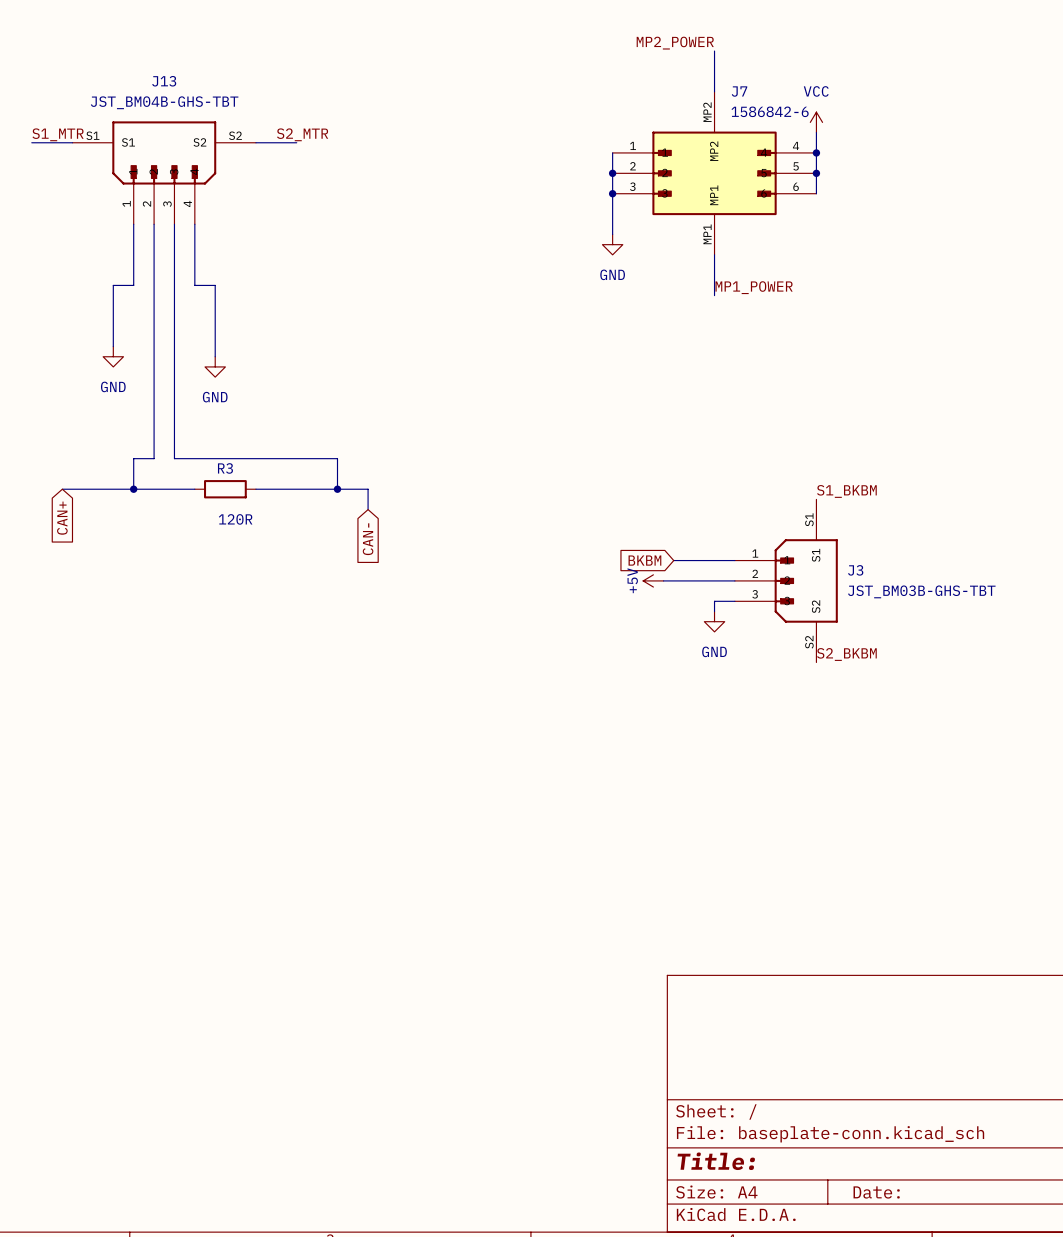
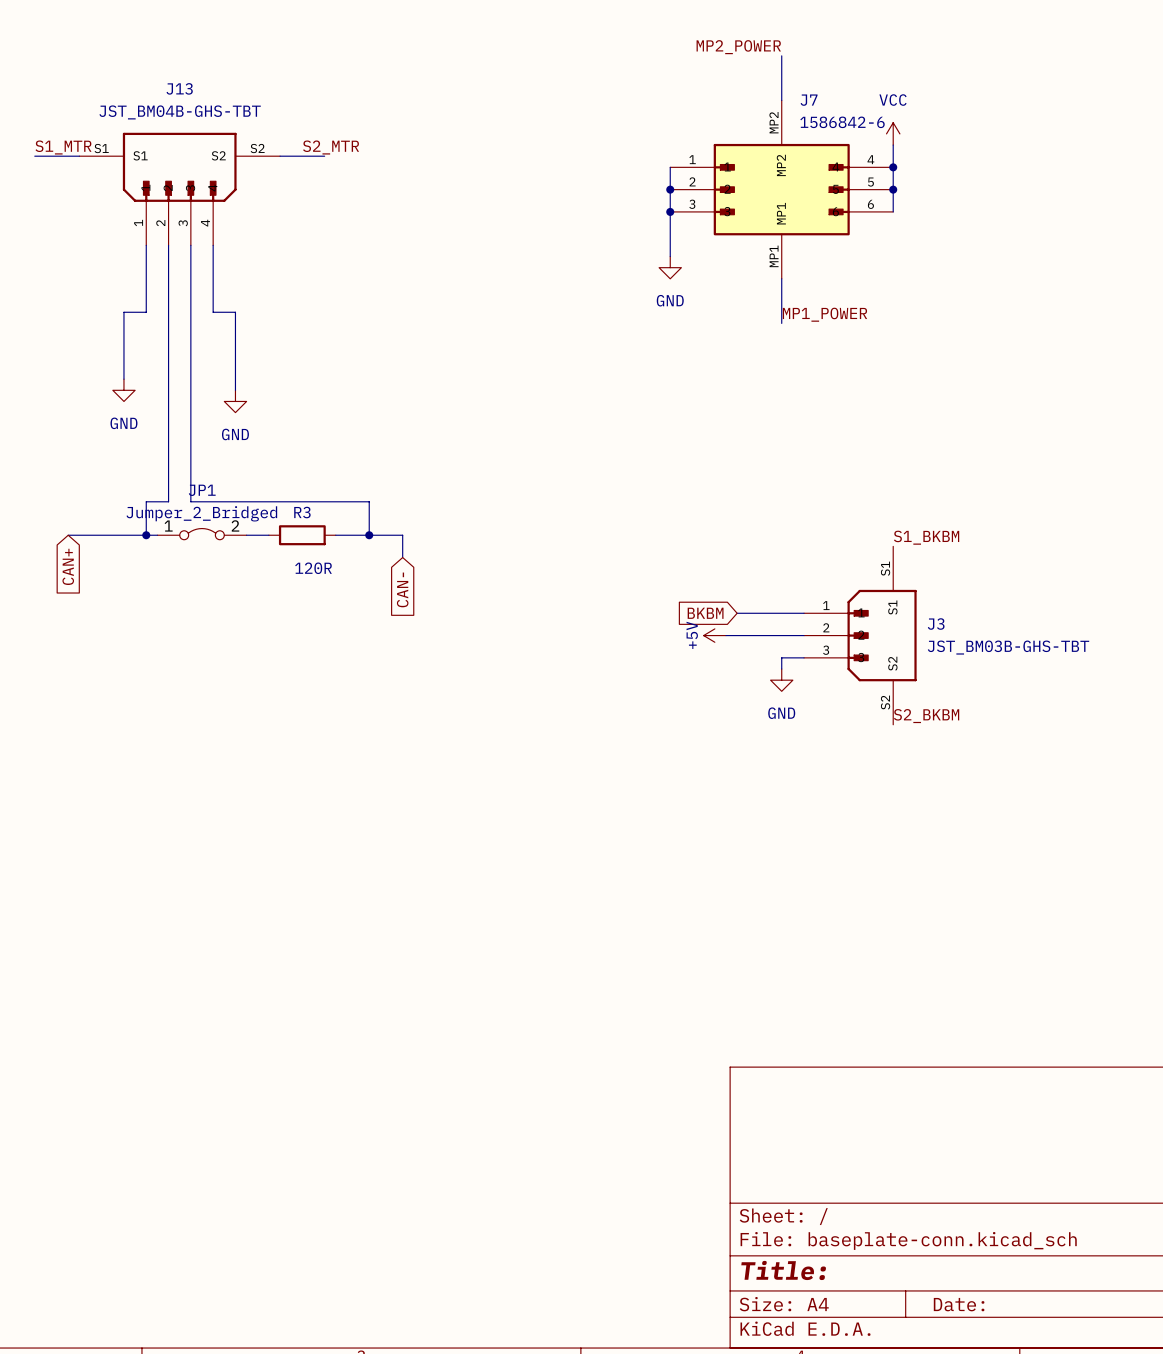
JP1: none -> Jumper_2_Bridged (202, 534)
wire: (143, 489) (194, 489) -> none
wire: none -> (246, 535) (268, 535)
R3 position: (225, 489) -> (302, 535)
wire: (255, 489) (306, 489) -> none

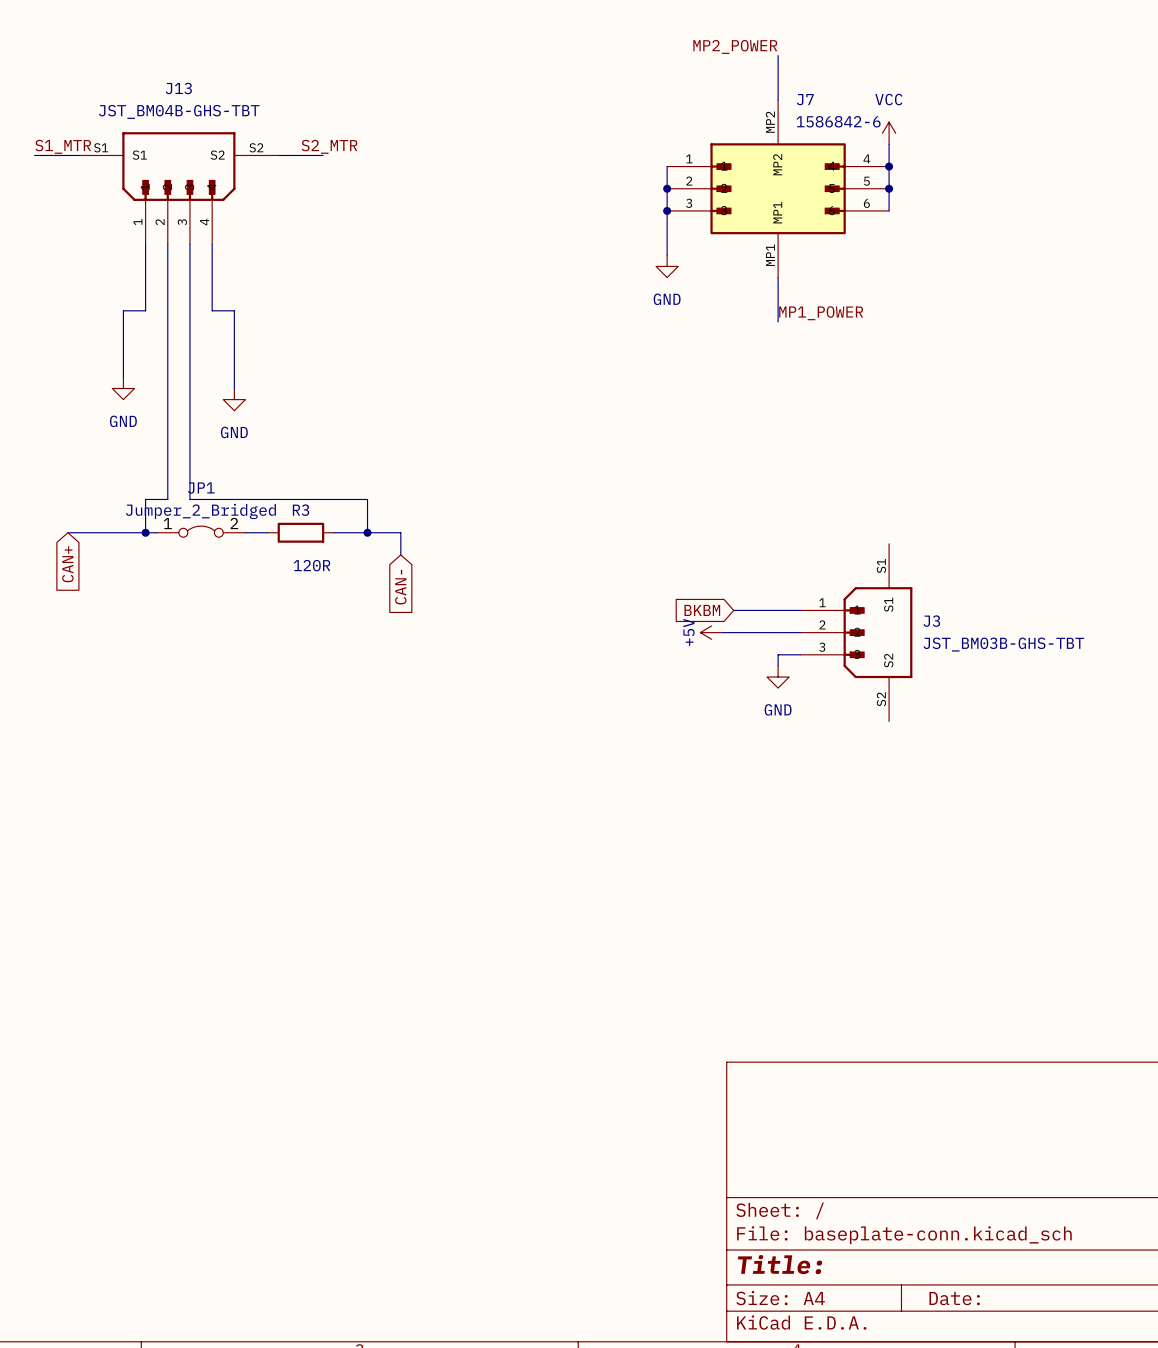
label: S1_BKBM (926, 537) -> none
label: S2_BKBM (926, 716) -> none

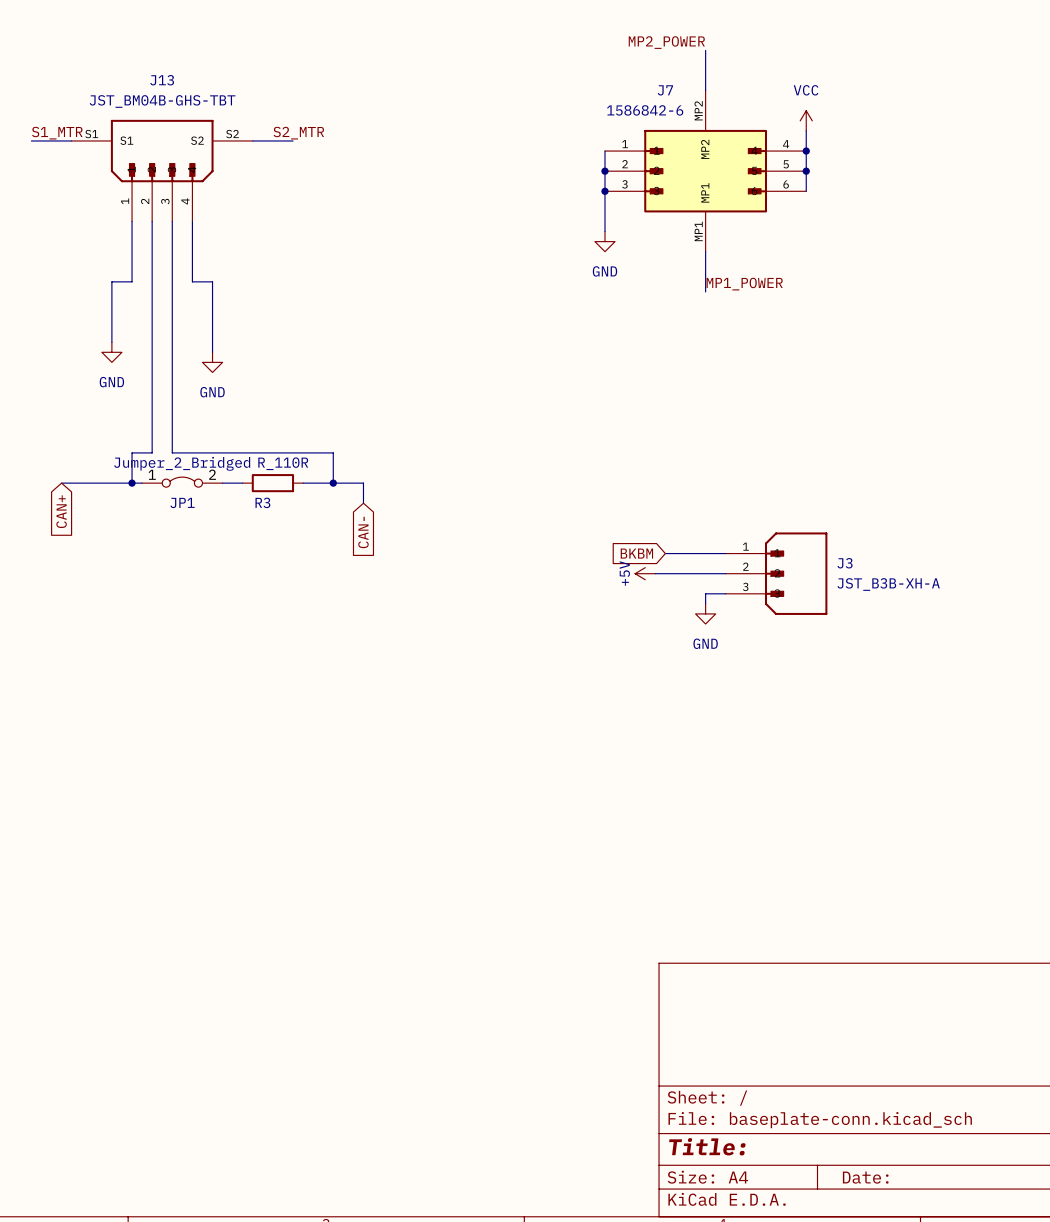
J7 name position: J7 (805, 99) -> J7 (665, 90)
J7 value position: 1586842-6 (838, 121) -> 1586842-6 (645, 110)
JP1 name position: JP1 (201, 488) -> JP1 (182, 502)
R3 name position: R3 (301, 510) -> R3 (262, 502)
J3 symbol: [800, 543, 913, 722] -> [725, 532, 828, 615]
R3 value: 120R (312, 565) -> R_110R (283, 463)
J3 value: JST_BM03B-GHS-TBT (1003, 644) -> JST_B3B-XH-A (888, 584)

